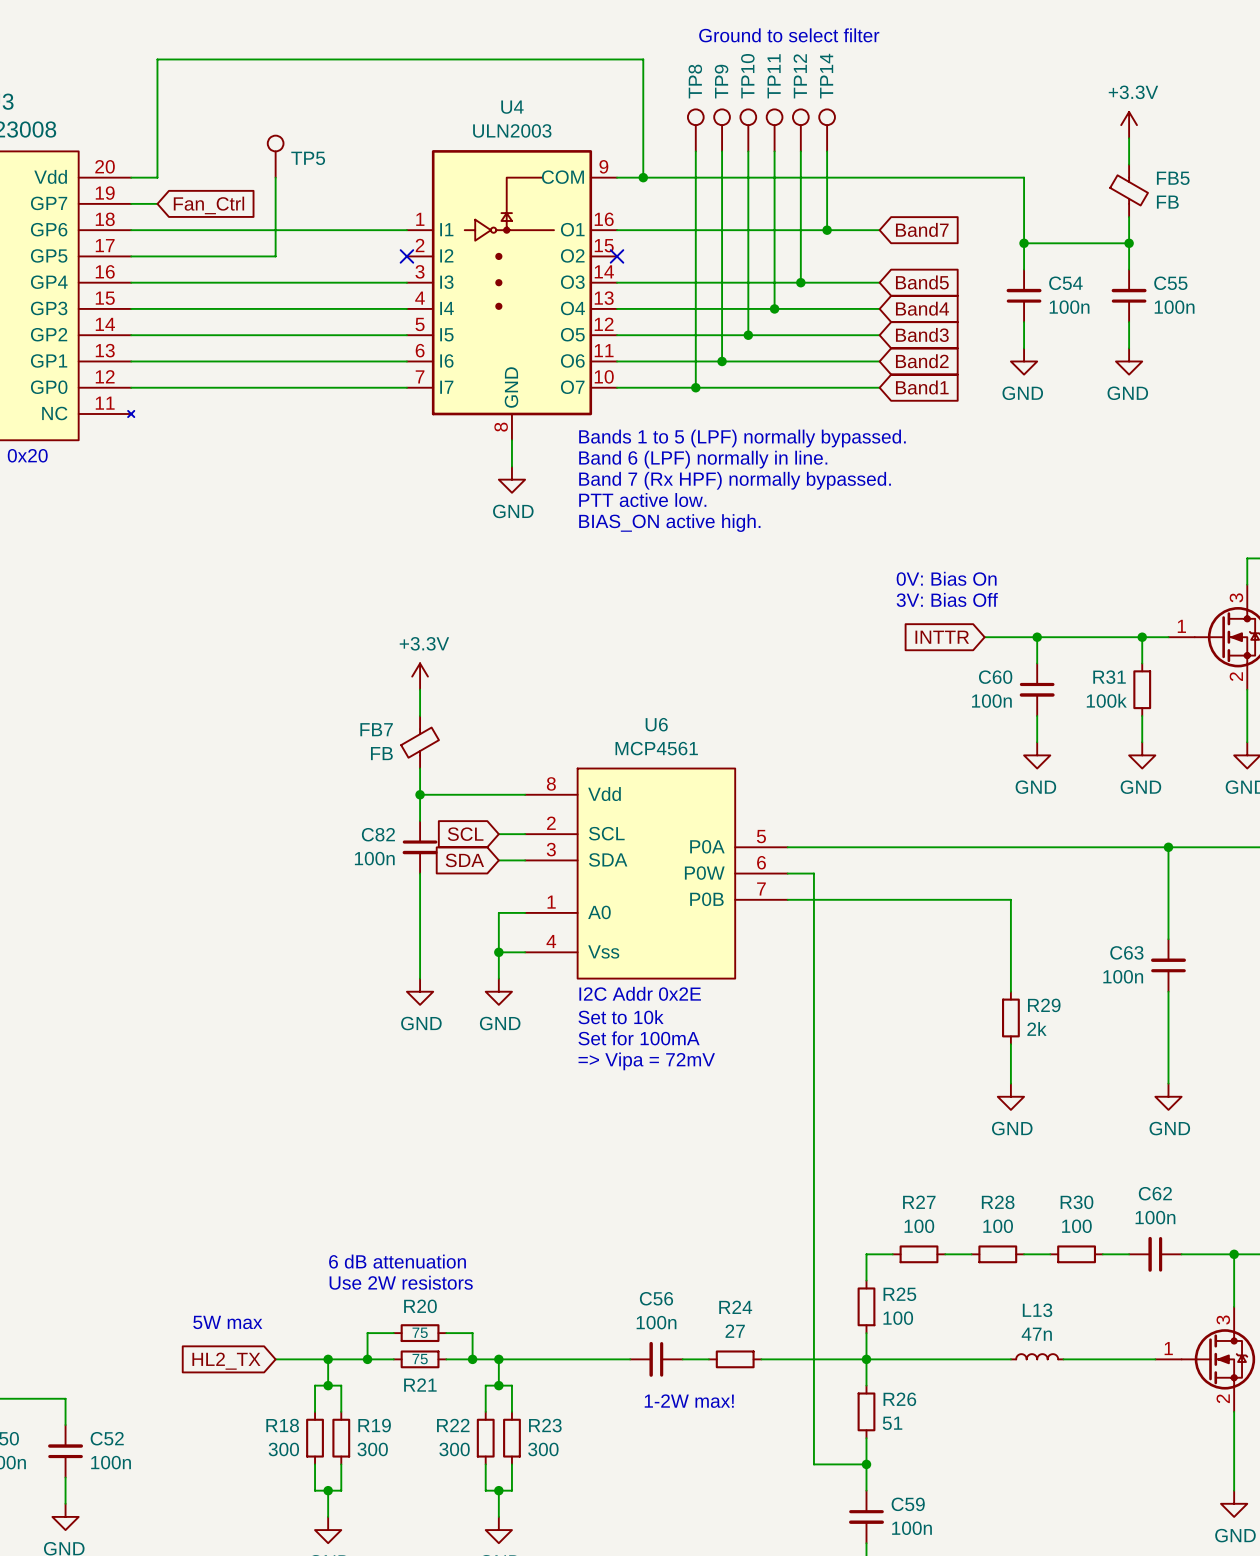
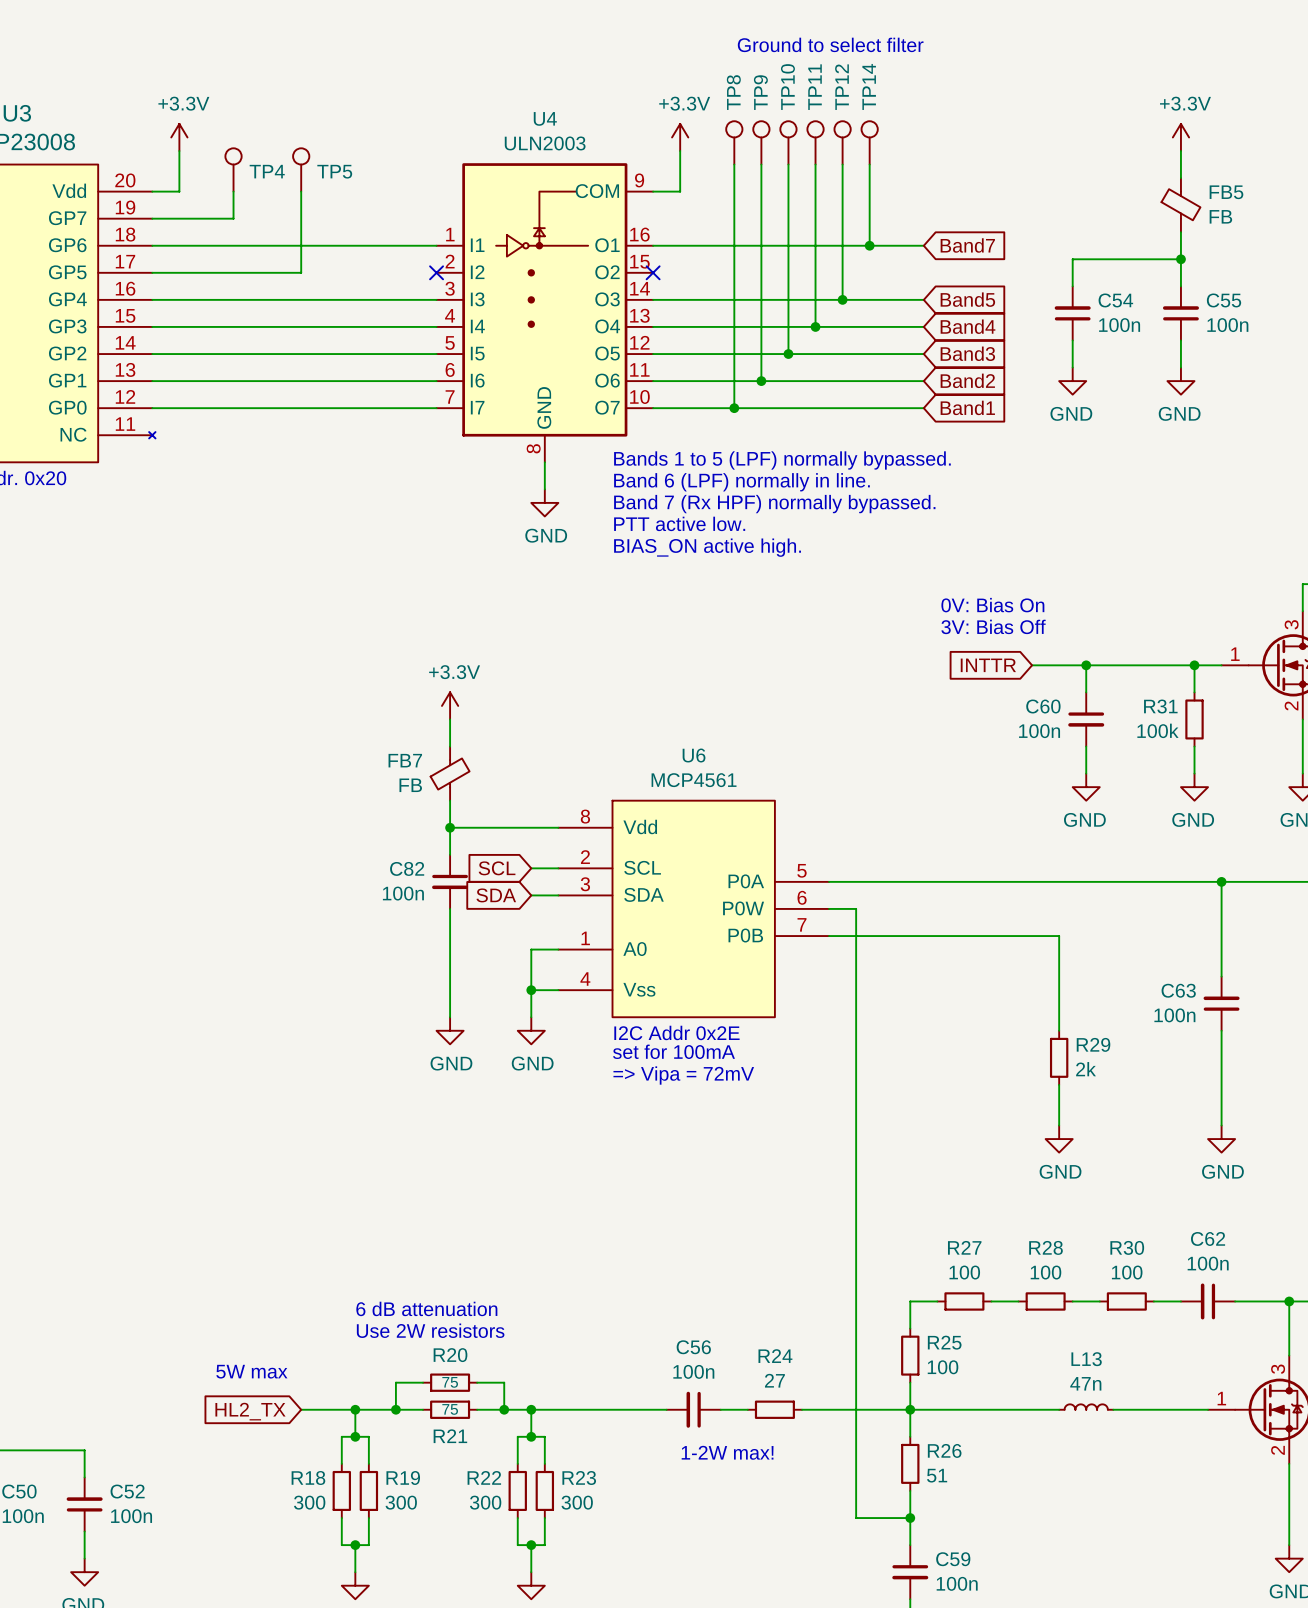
power symbol: none -> +3.3V (179, 137)
power symbol: none -> +3.3V (680, 137)
wire: (157, 138) (157, 59) (643, 59) (643, 138) -> none
TP4: none -> (233, 169)
wire: none -> (233, 191) (233, 218) (179, 218)
wire: (643, 177) (1024, 177) (1024, 243) -> none
junction: (643, 177) -> none
global label: Fan_Ctrl (208, 205) -> none
junction: (1024, 243) -> none
text: Set to 10k (621, 1017) -> set for 100mA (673, 1051)
text: Set for 100mA (639, 1038) -> => Vipa = 72mV (683, 1075)
text: => Vipa = 72mV (646, 1061) -> none

